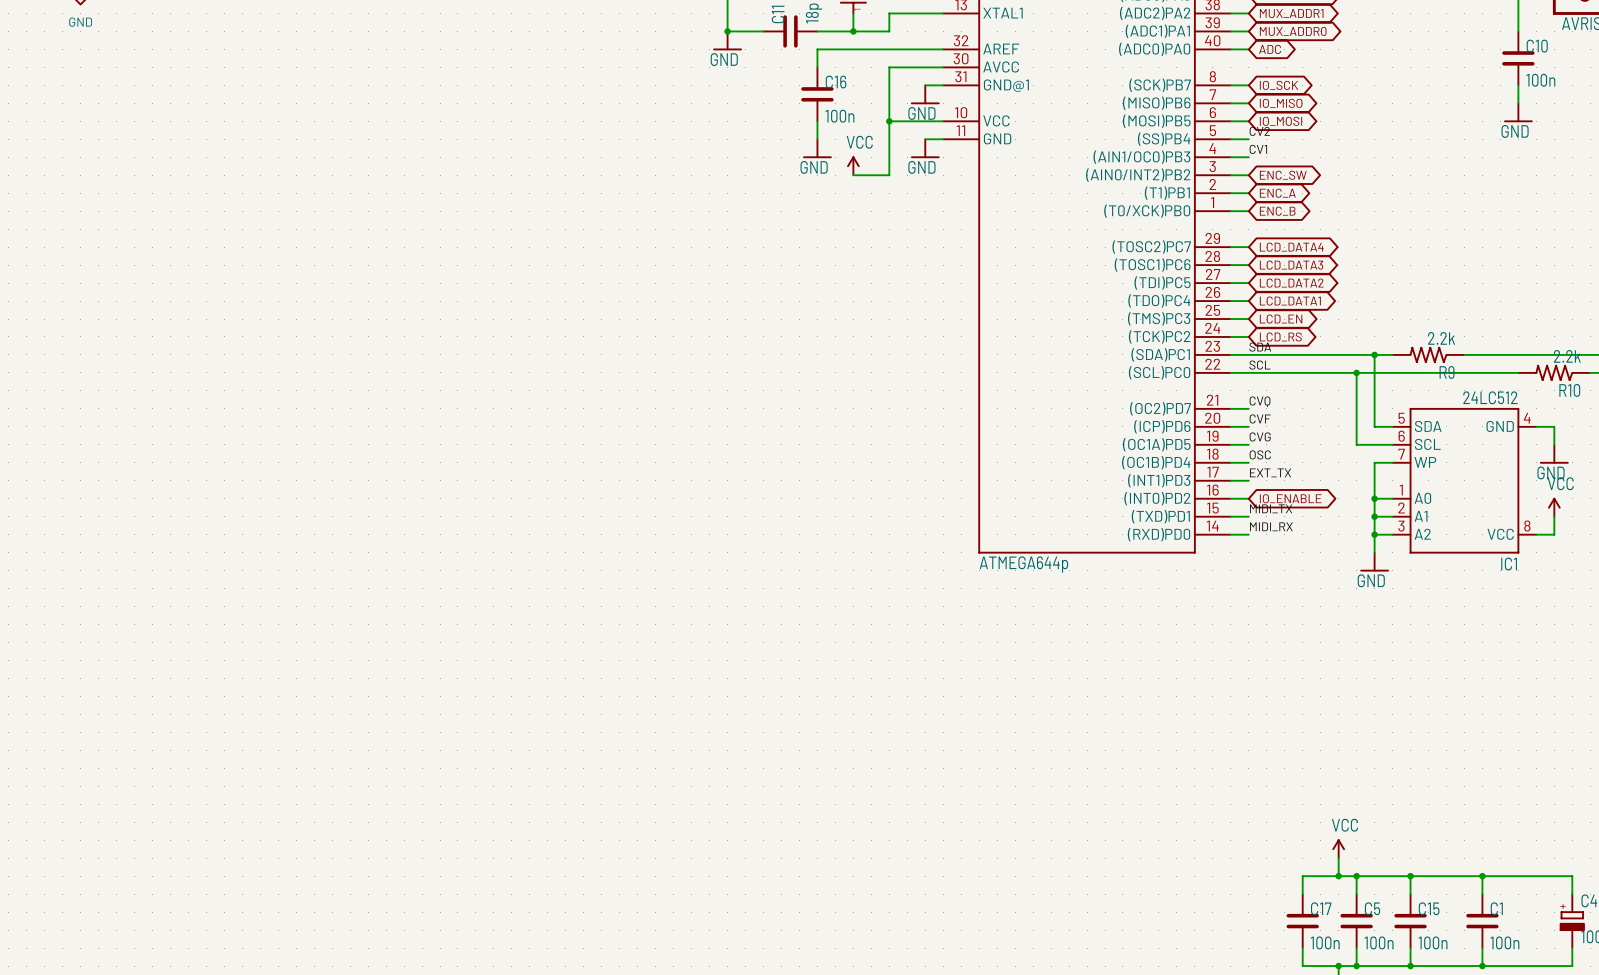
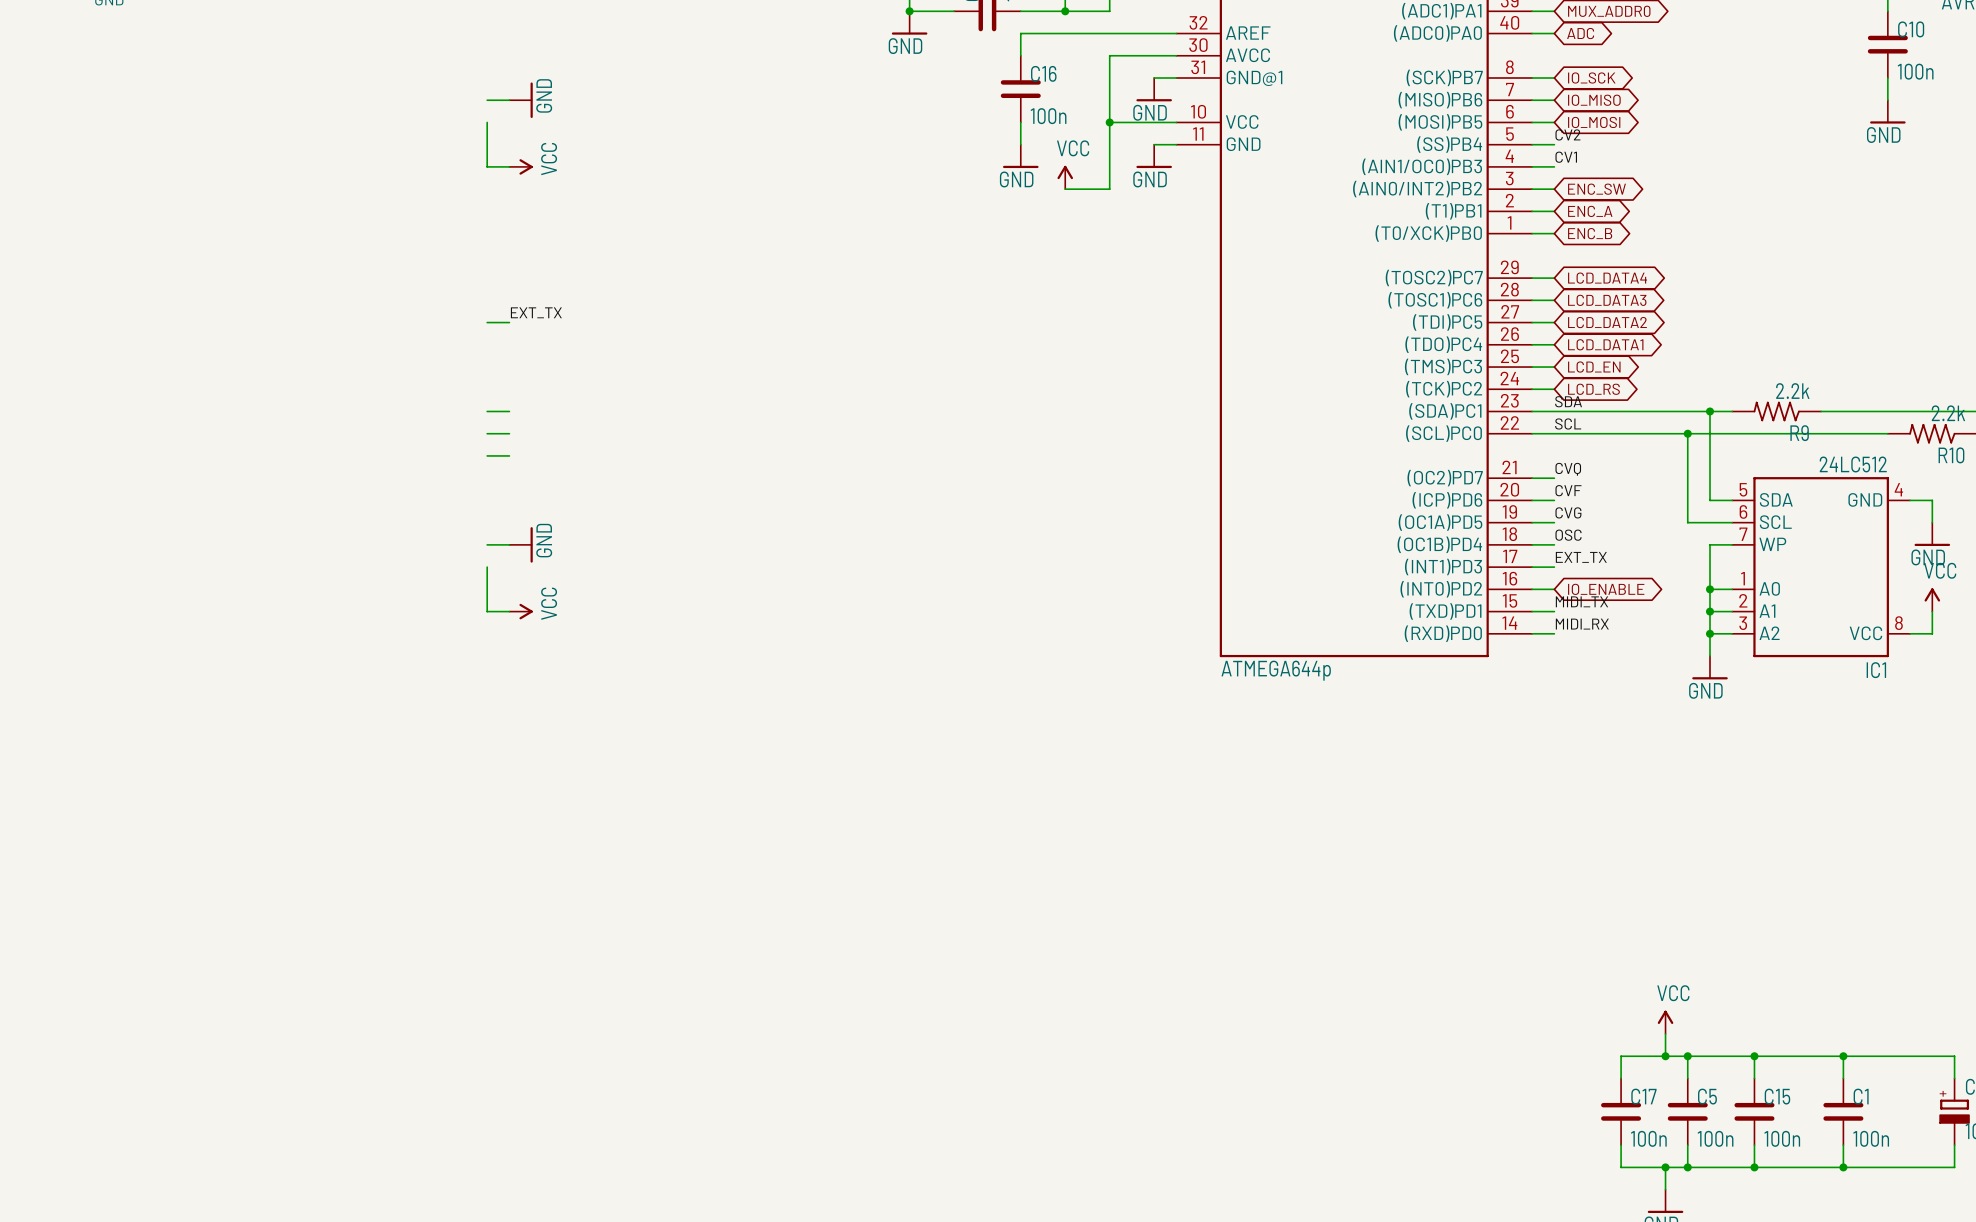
wire: none -> (487, 100) (509, 100)
power symbol: none -> GND (521, 100)
wire: none -> (487, 122) (487, 166) (509, 166)
power symbol: none -> VCC (521, 166)
label: none -> EXT_TX (536, 312)
wire: none -> (487, 322) (509, 322)
wire: none -> (487, 411) (509, 411)
wire: none -> (487, 433) (509, 433)
wire: none -> (487, 455) (509, 455)
wire: none -> (487, 544) (509, 544)
power symbol: none -> GND (521, 544)
wire: none -> (487, 567) (487, 611) (509, 611)
power symbol: none -> VCC (521, 611)

